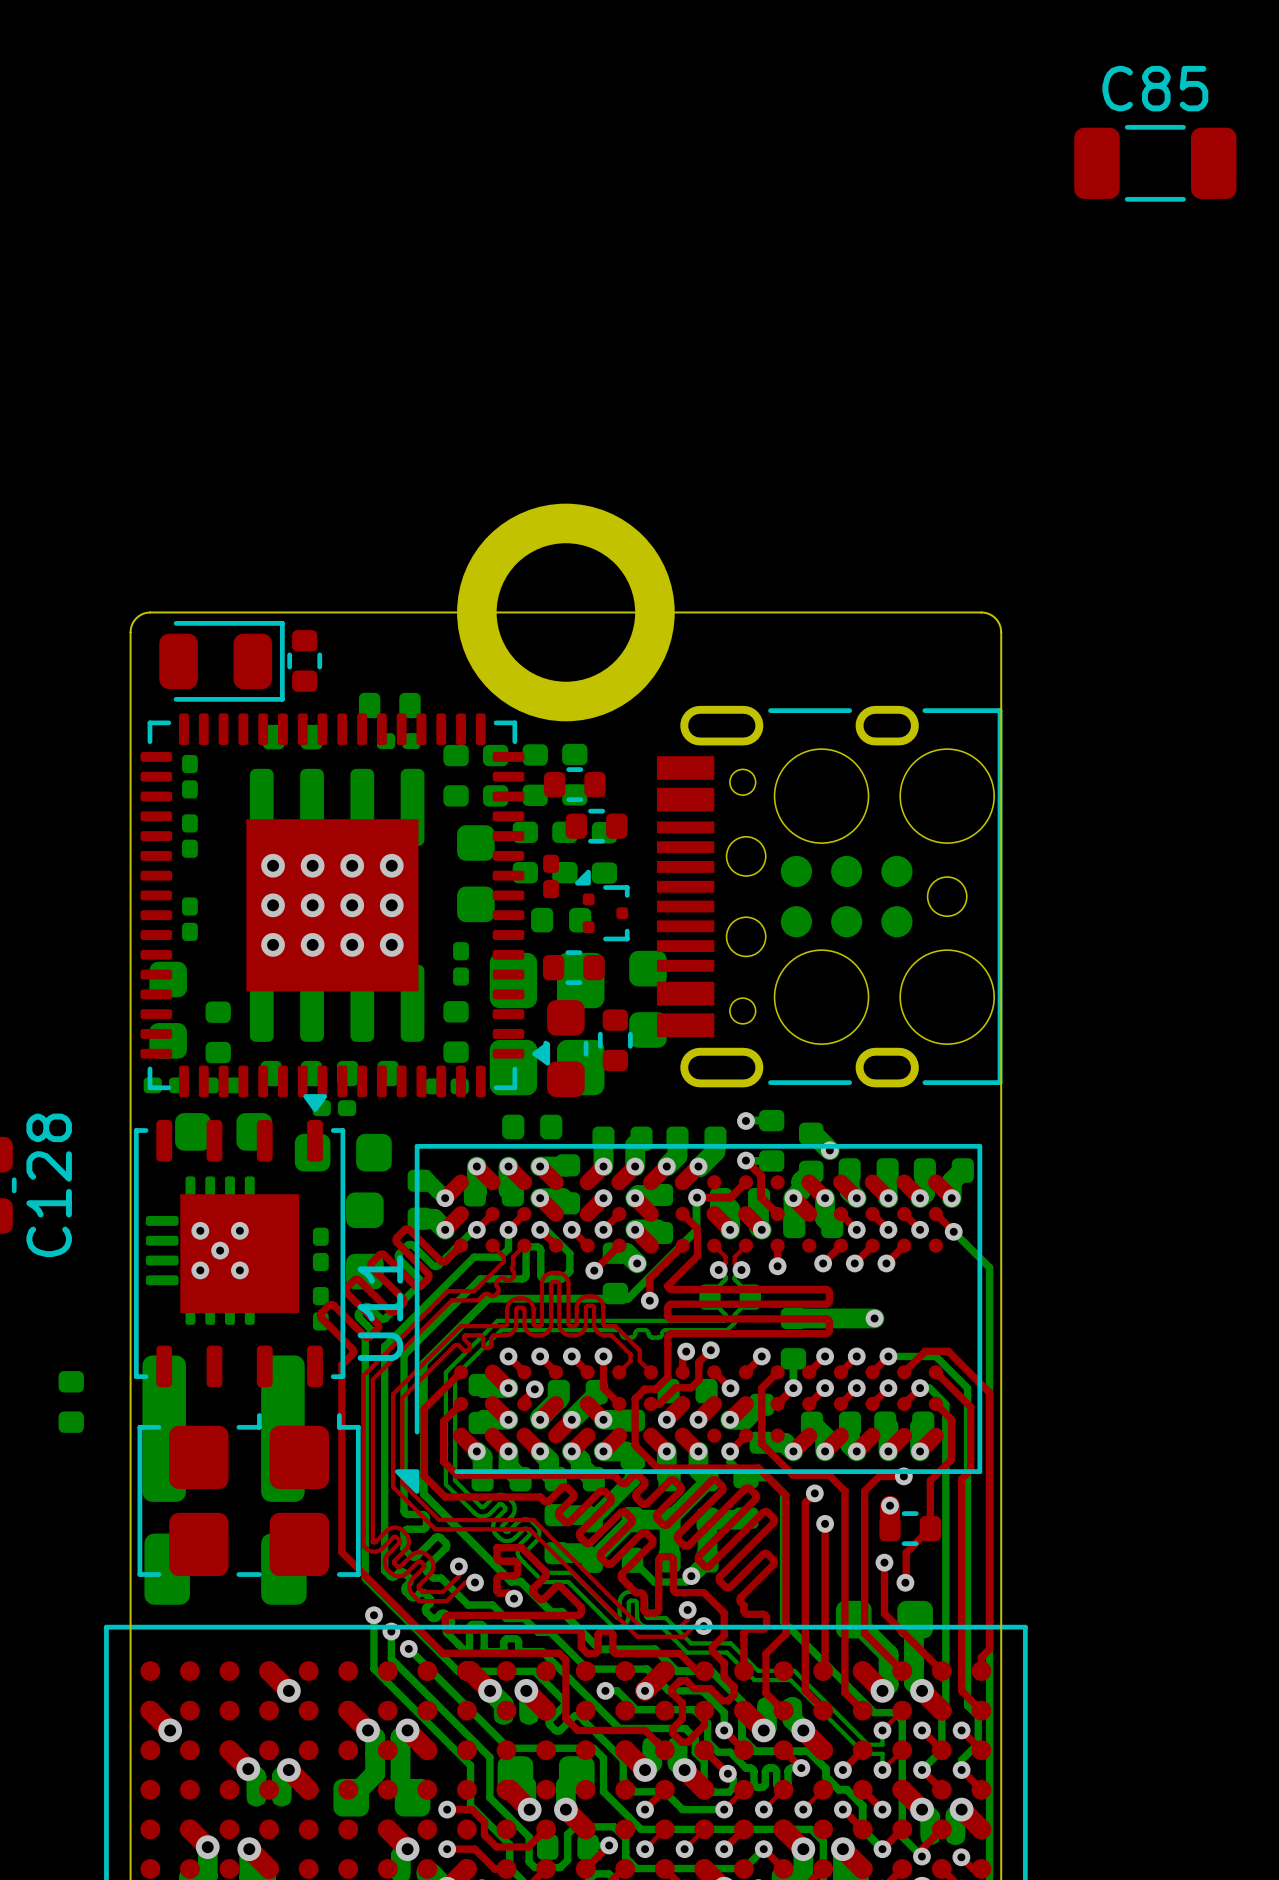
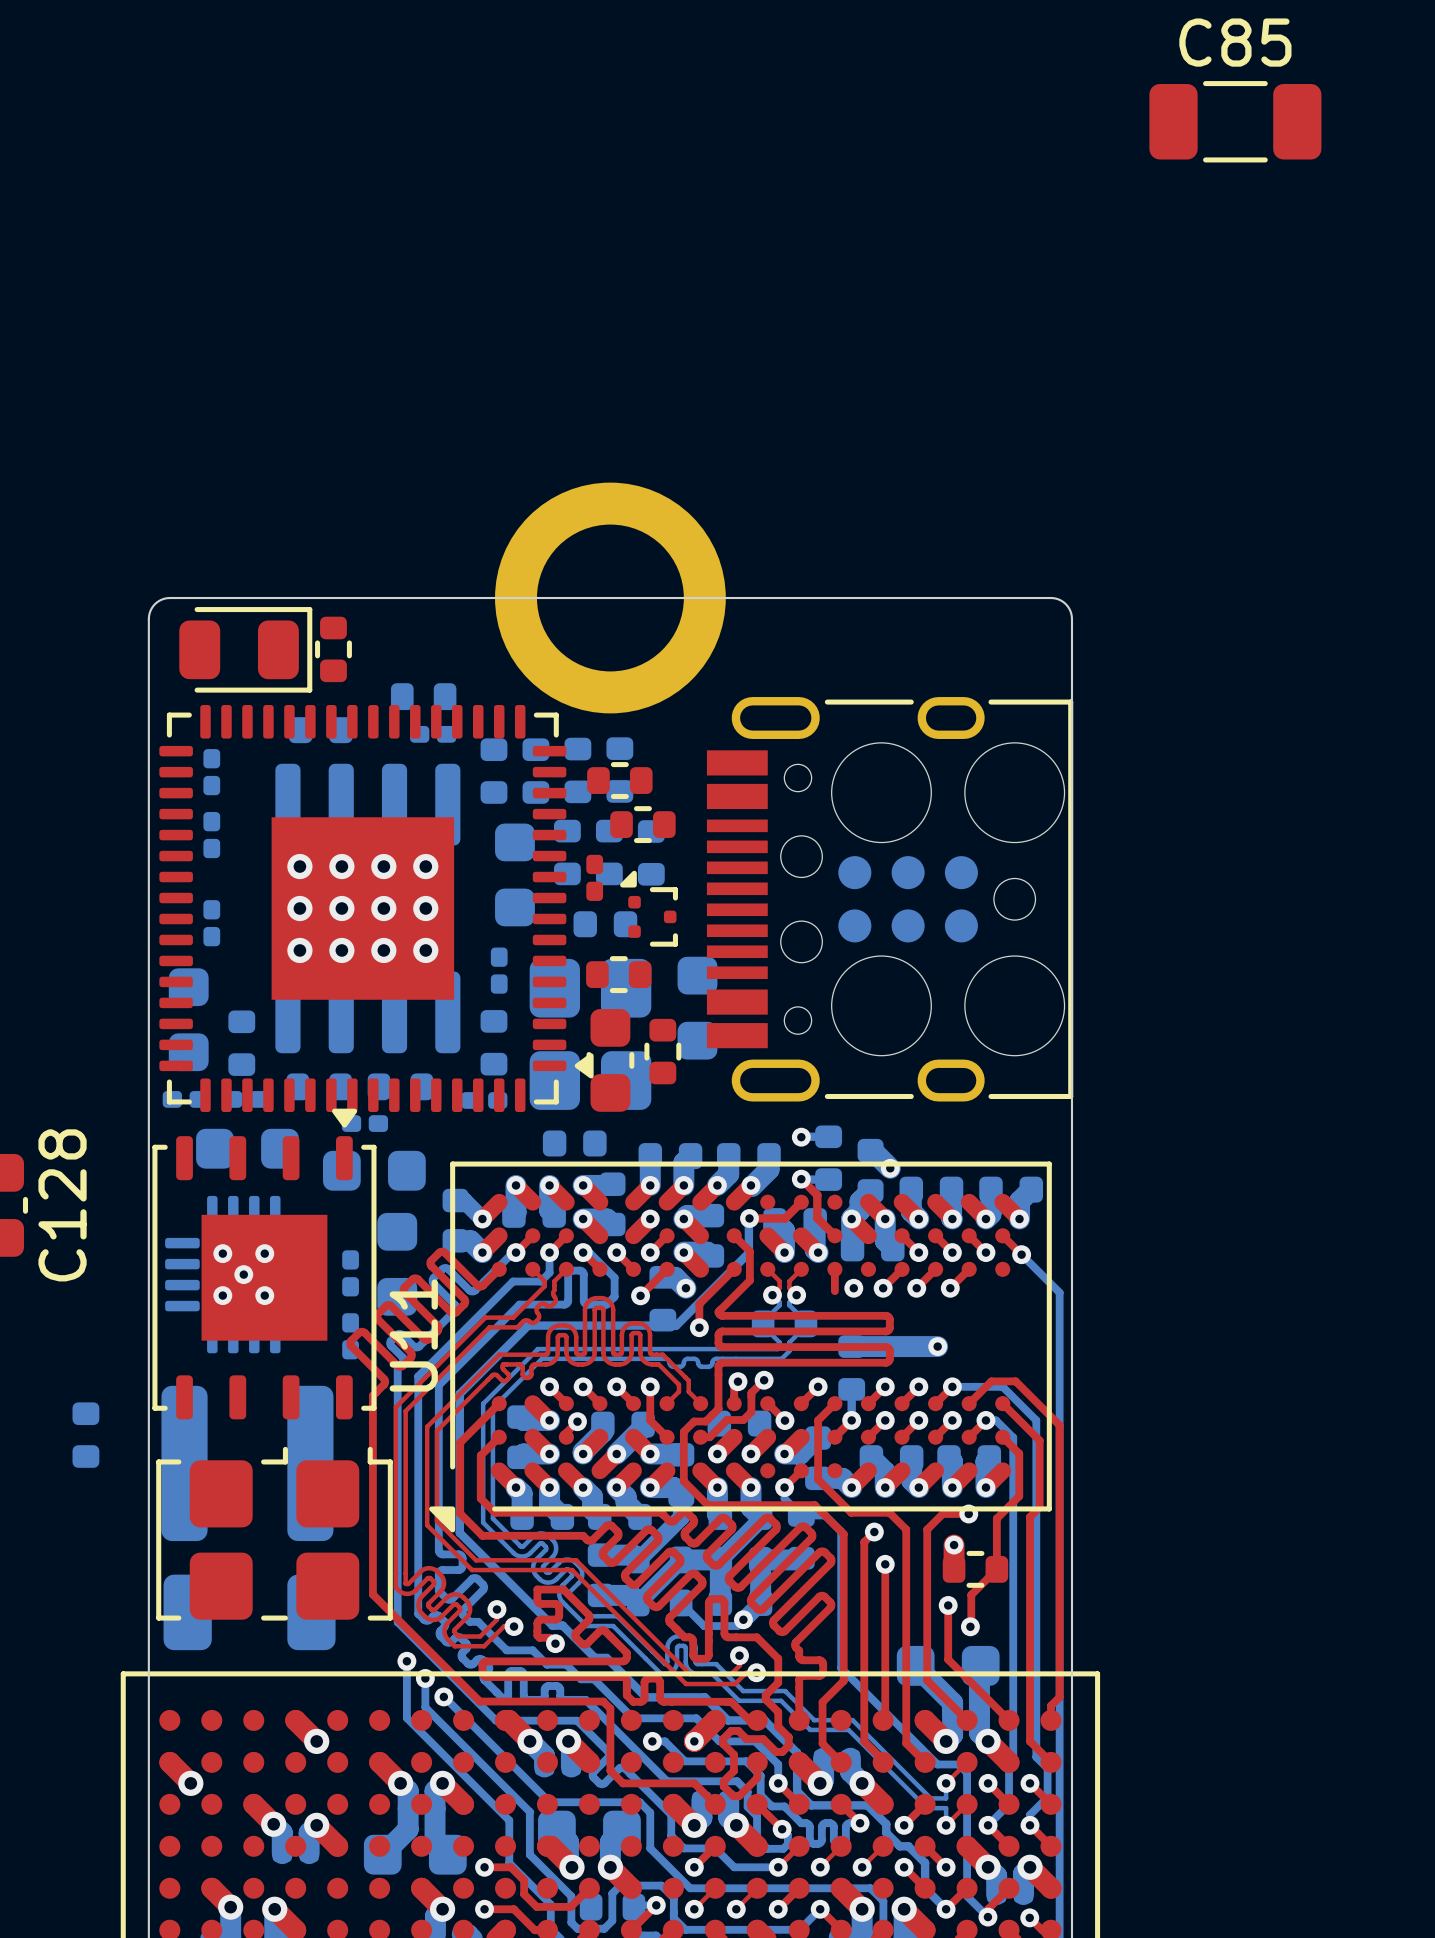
via position: (777, 1266) -> (853, 1288)

